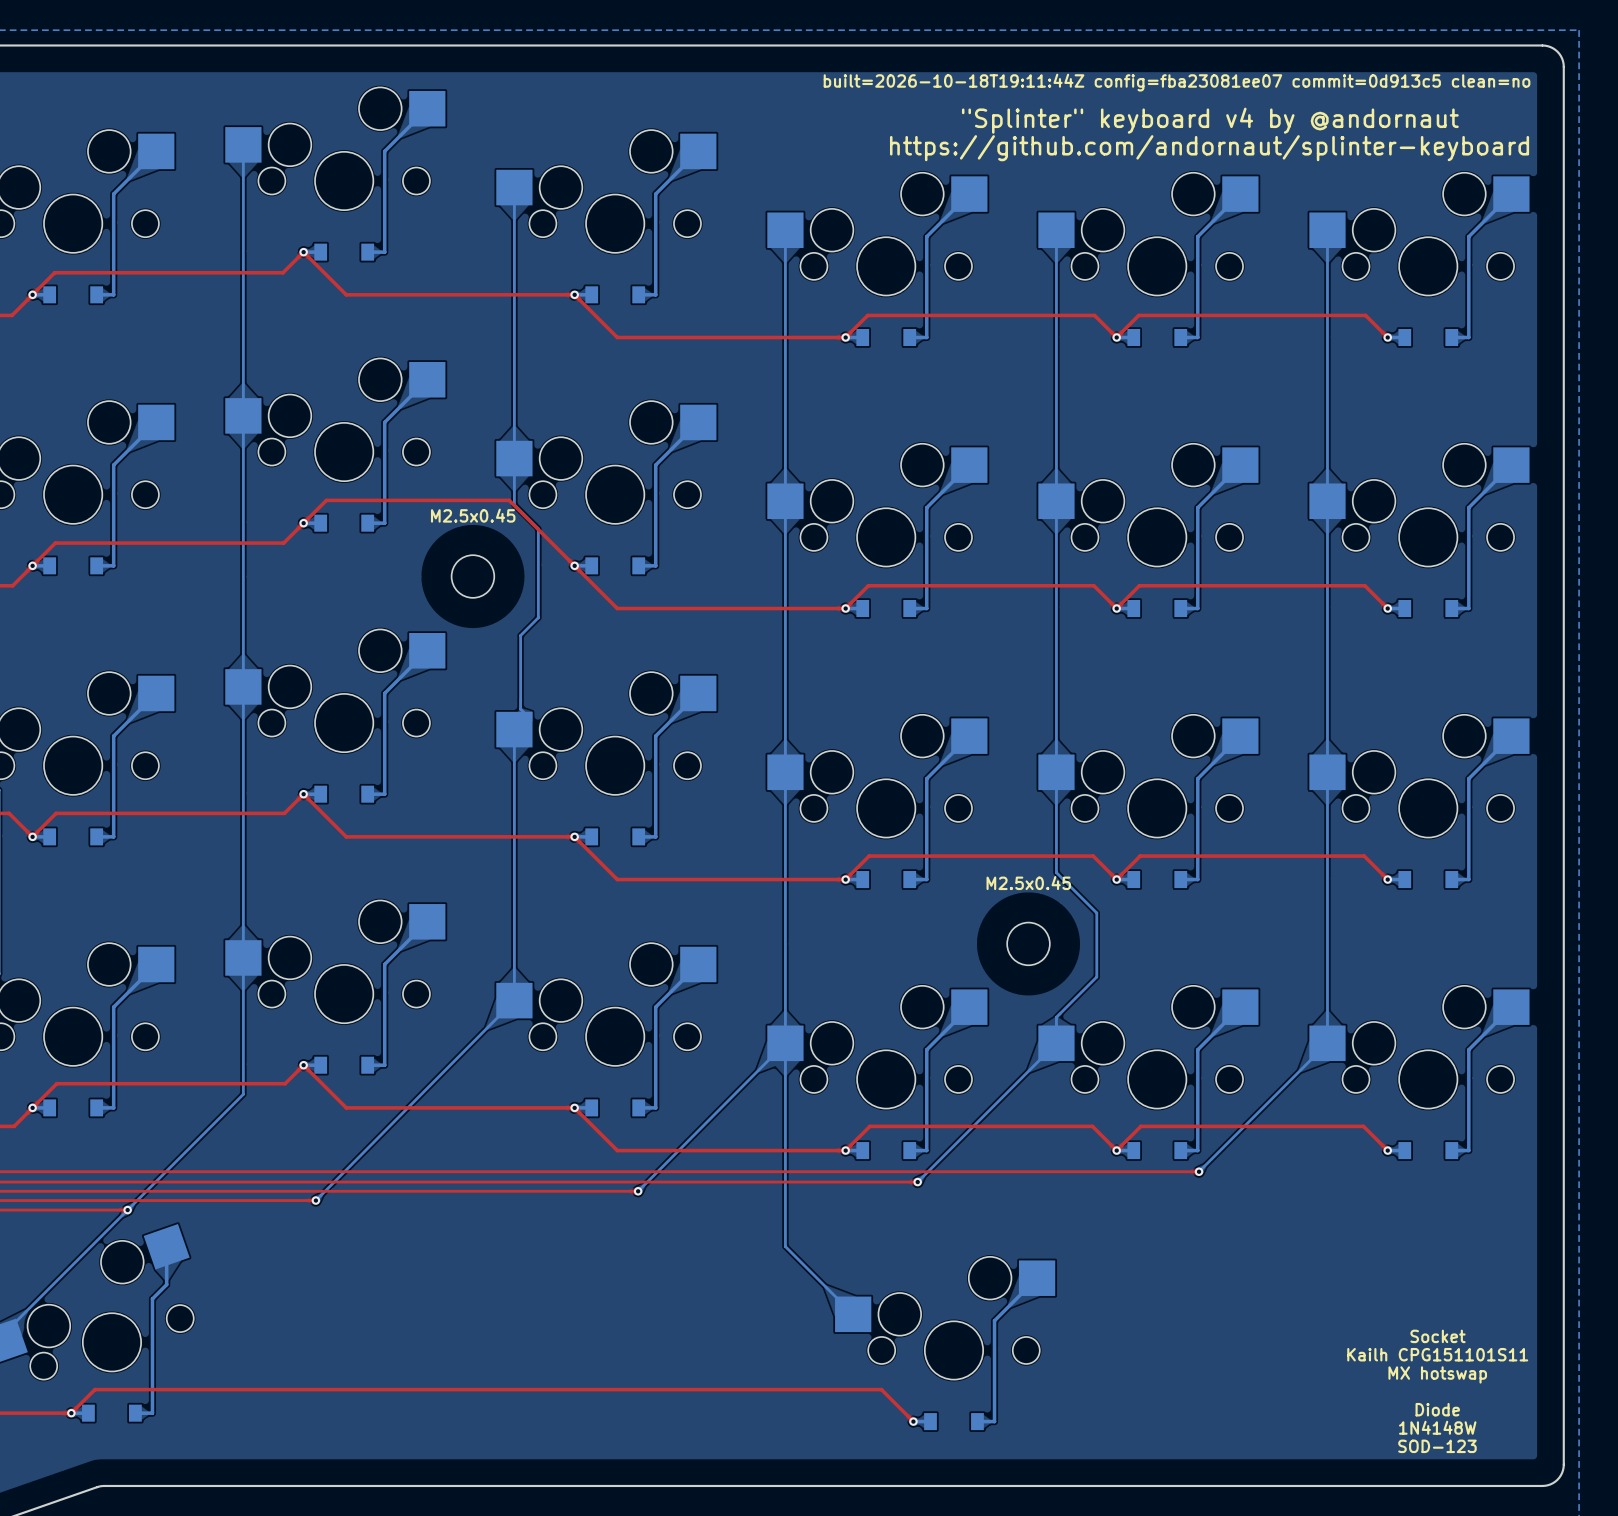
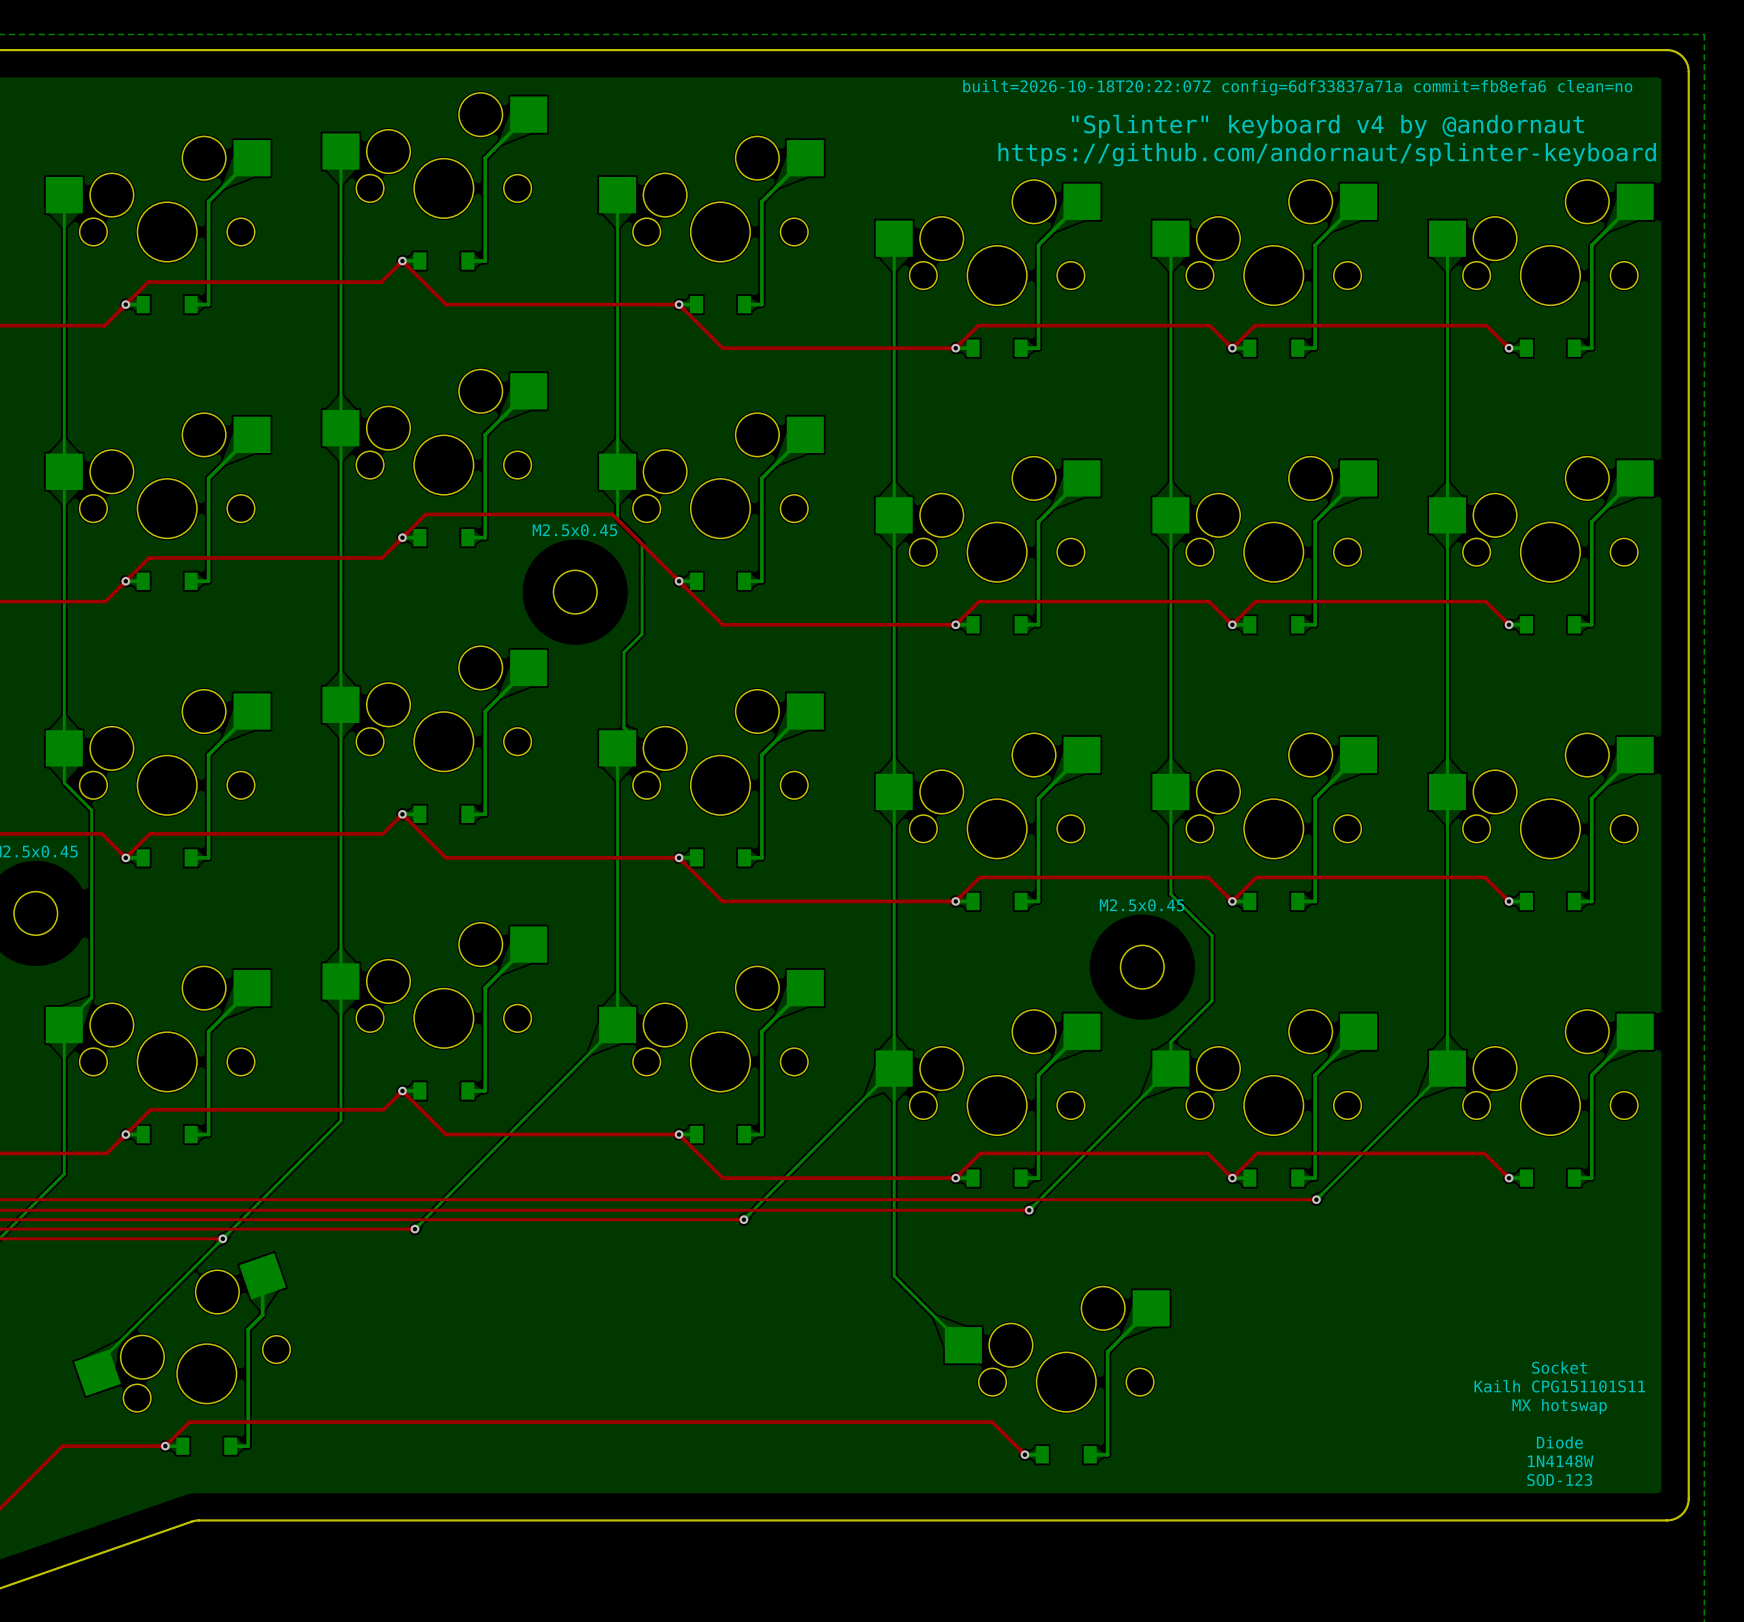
text: built=2026-10-18T19:11:44Z config=fba23081ee07 commit=0d913c5 clean=no (1177, 82) -> built=2026-10-18T20:22:07Z config=6df33837a71a commit=fb8efa6 clean=no (1297, 87)

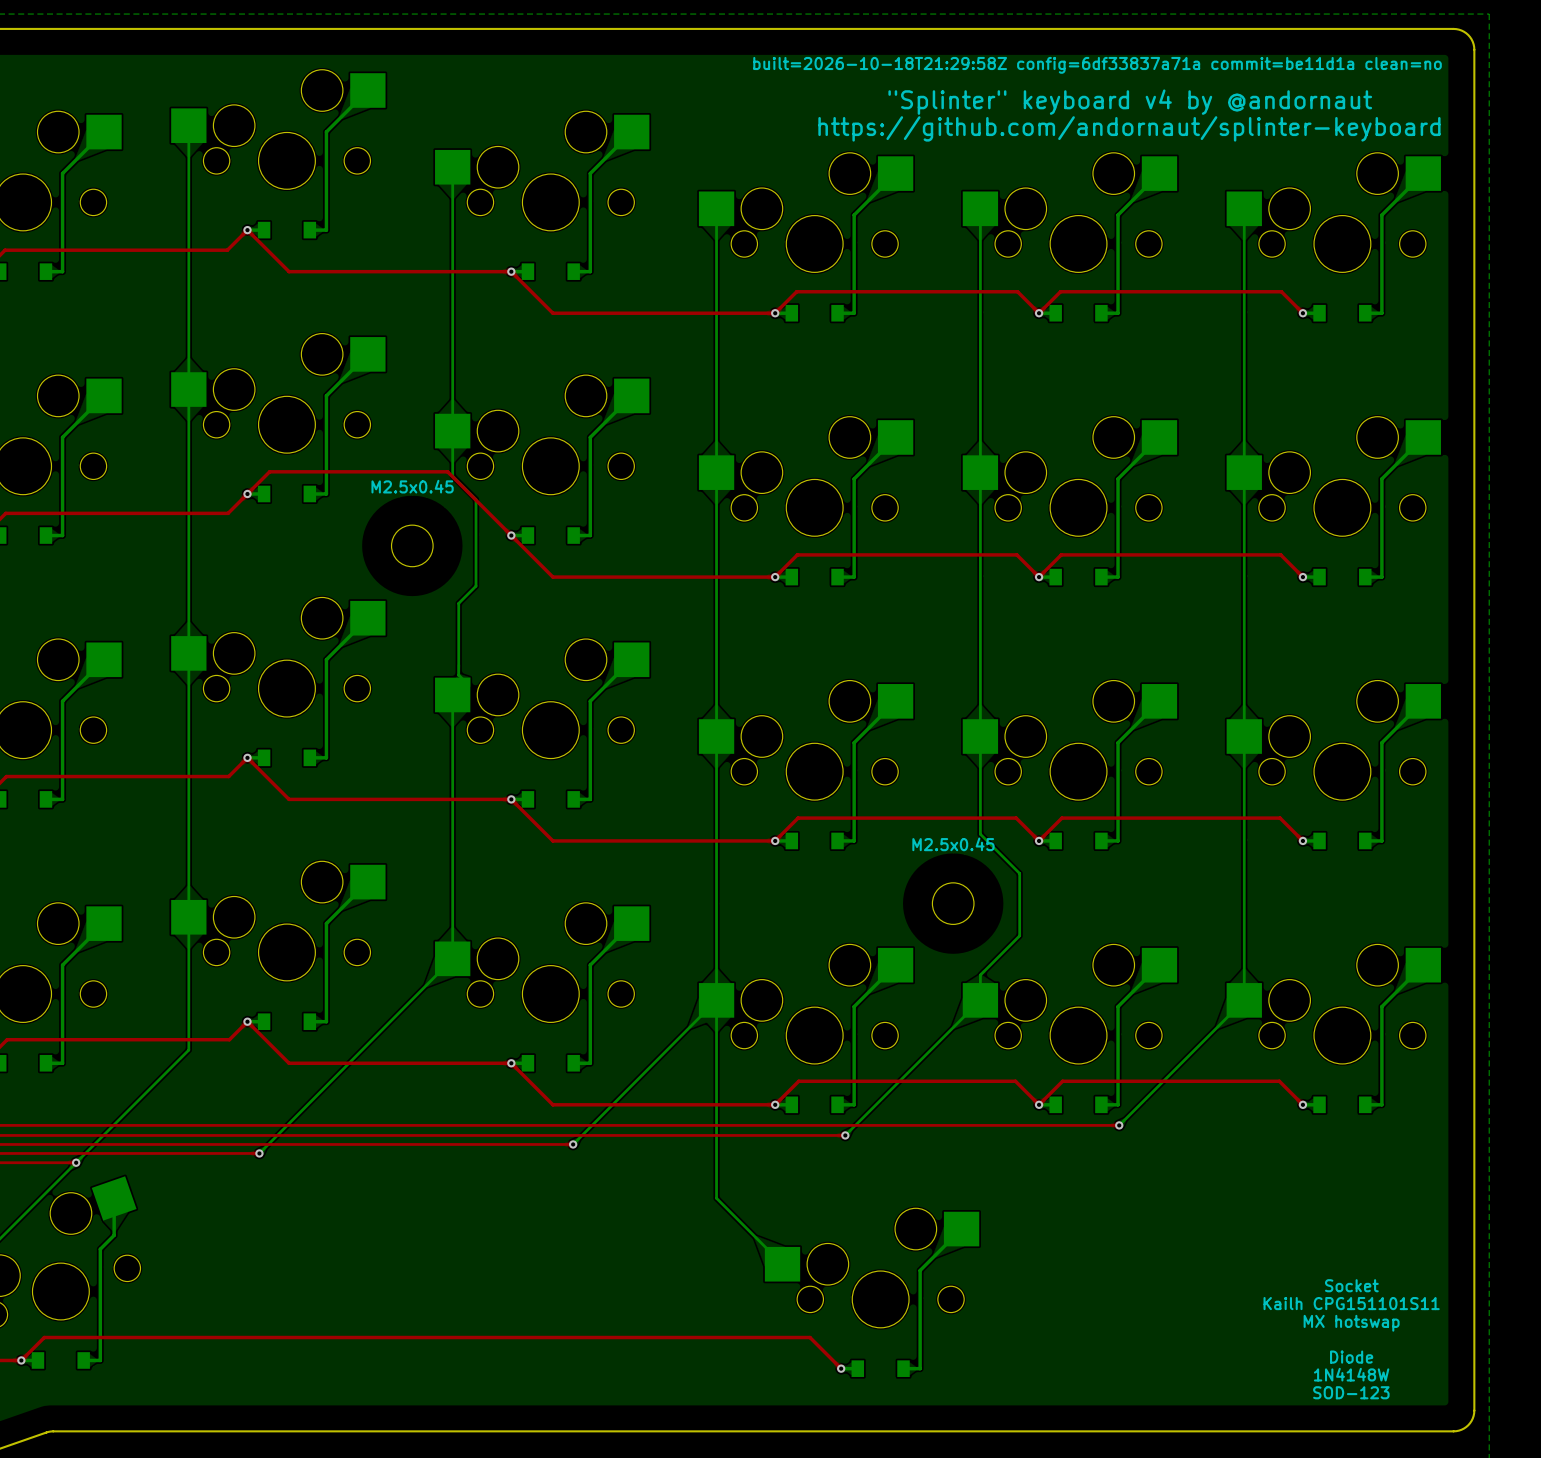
text: built=2026-10-18T20:22:07Z config=6df33837a71a commit=fb8efa6 clean=no (1297, 87) -> built=2026-10-18T21:29:58Z config=6df33837a71a commit=be11d1a clean=no (1097, 65)

